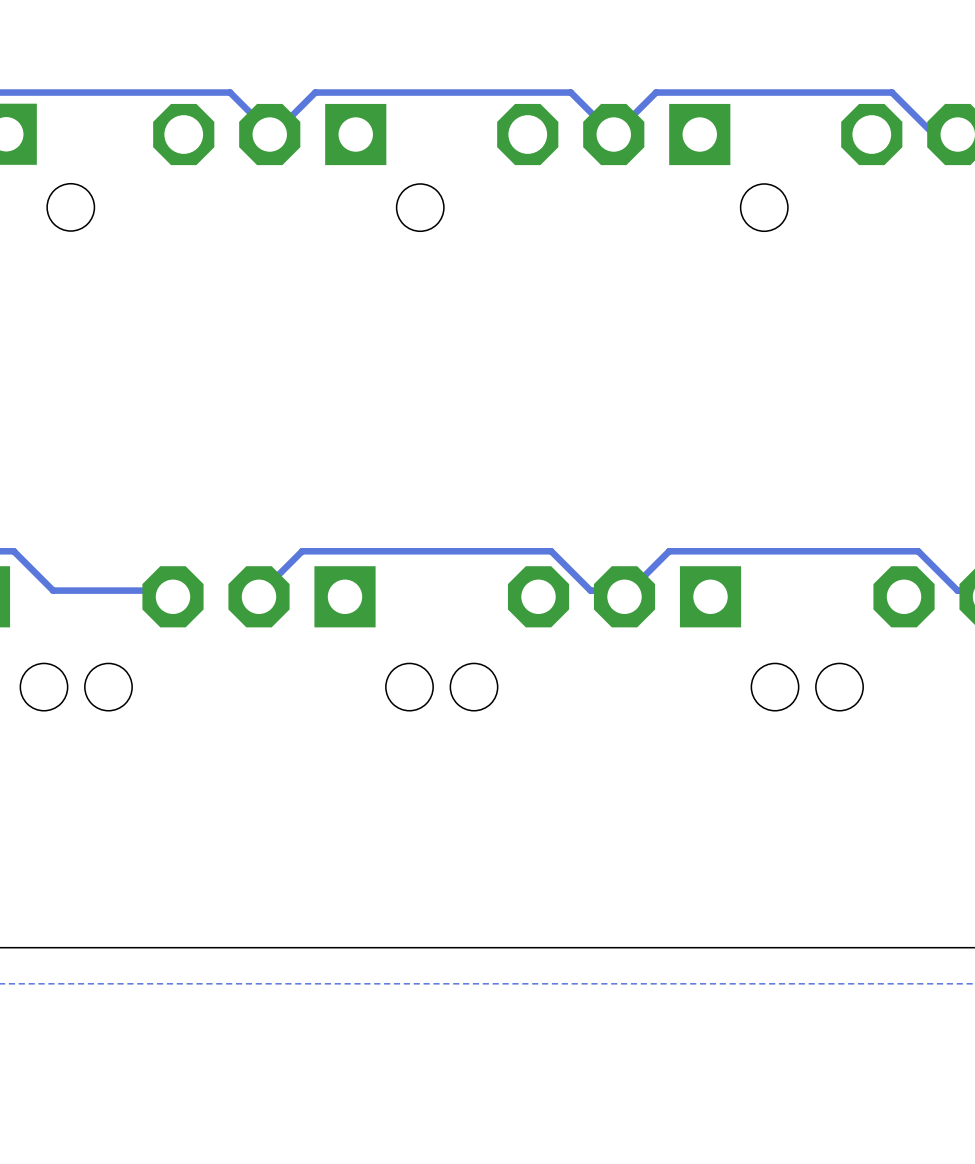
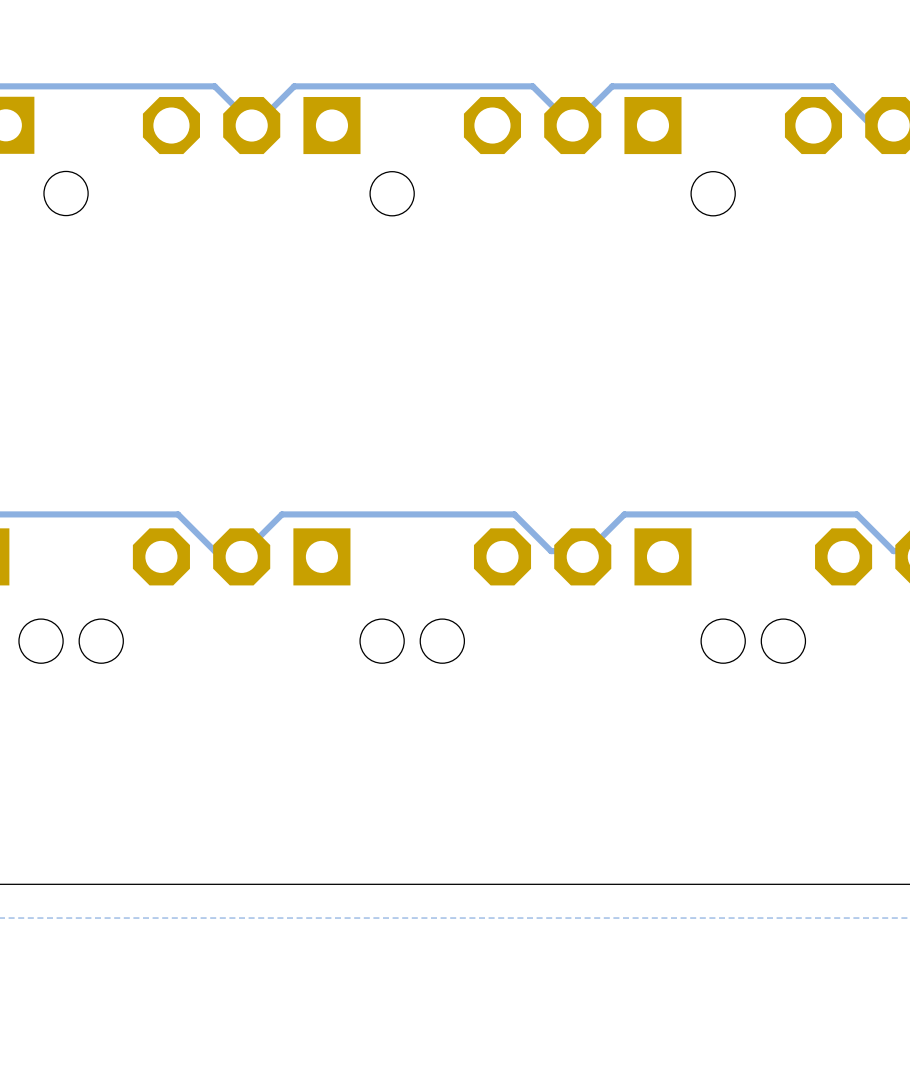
track: (13, 551) (53, 590) (171, 590) (172, 596) -> (12, 514) (178, 514) (214, 551) (239, 551) (241, 556)

